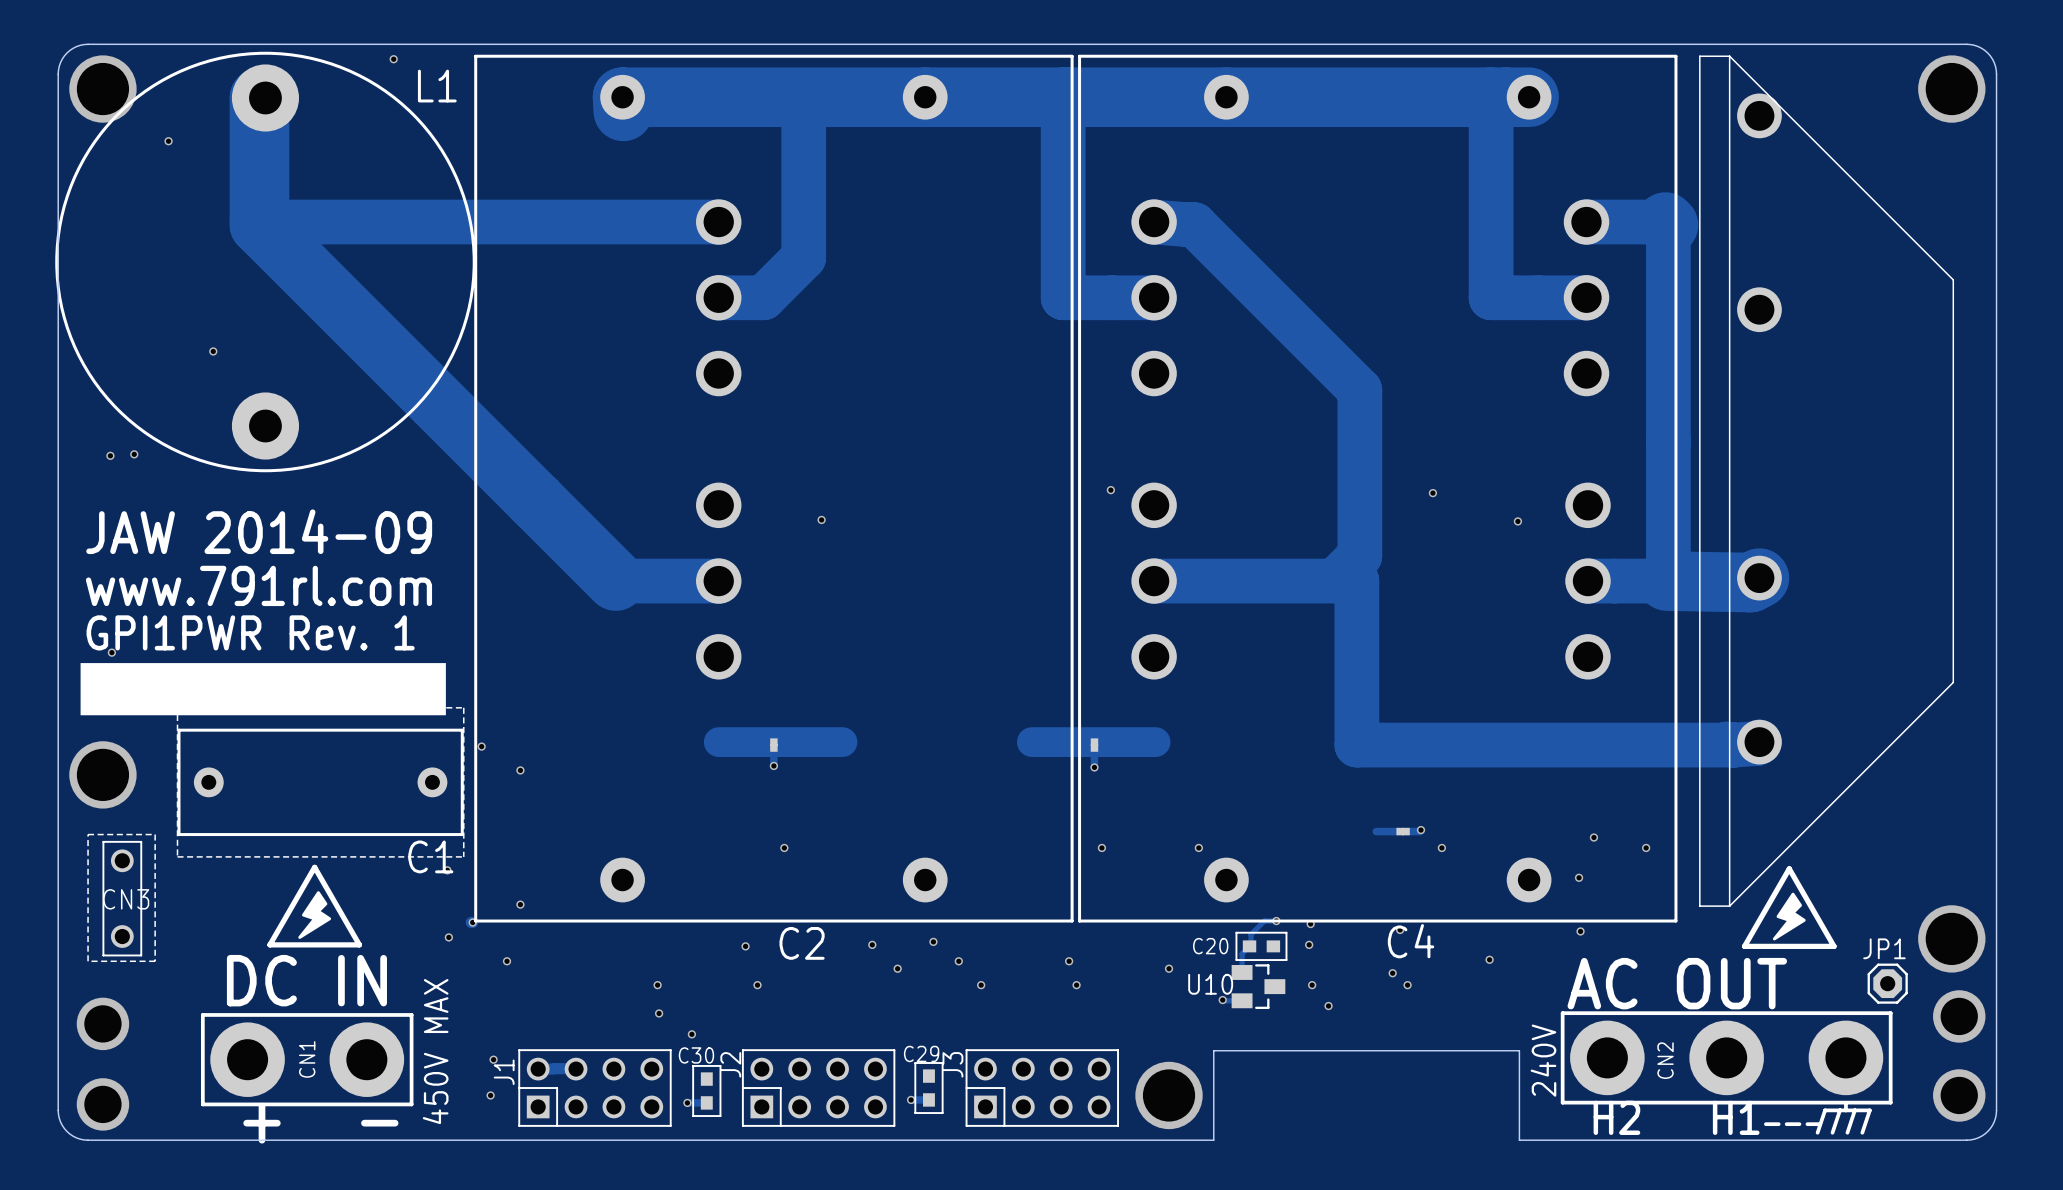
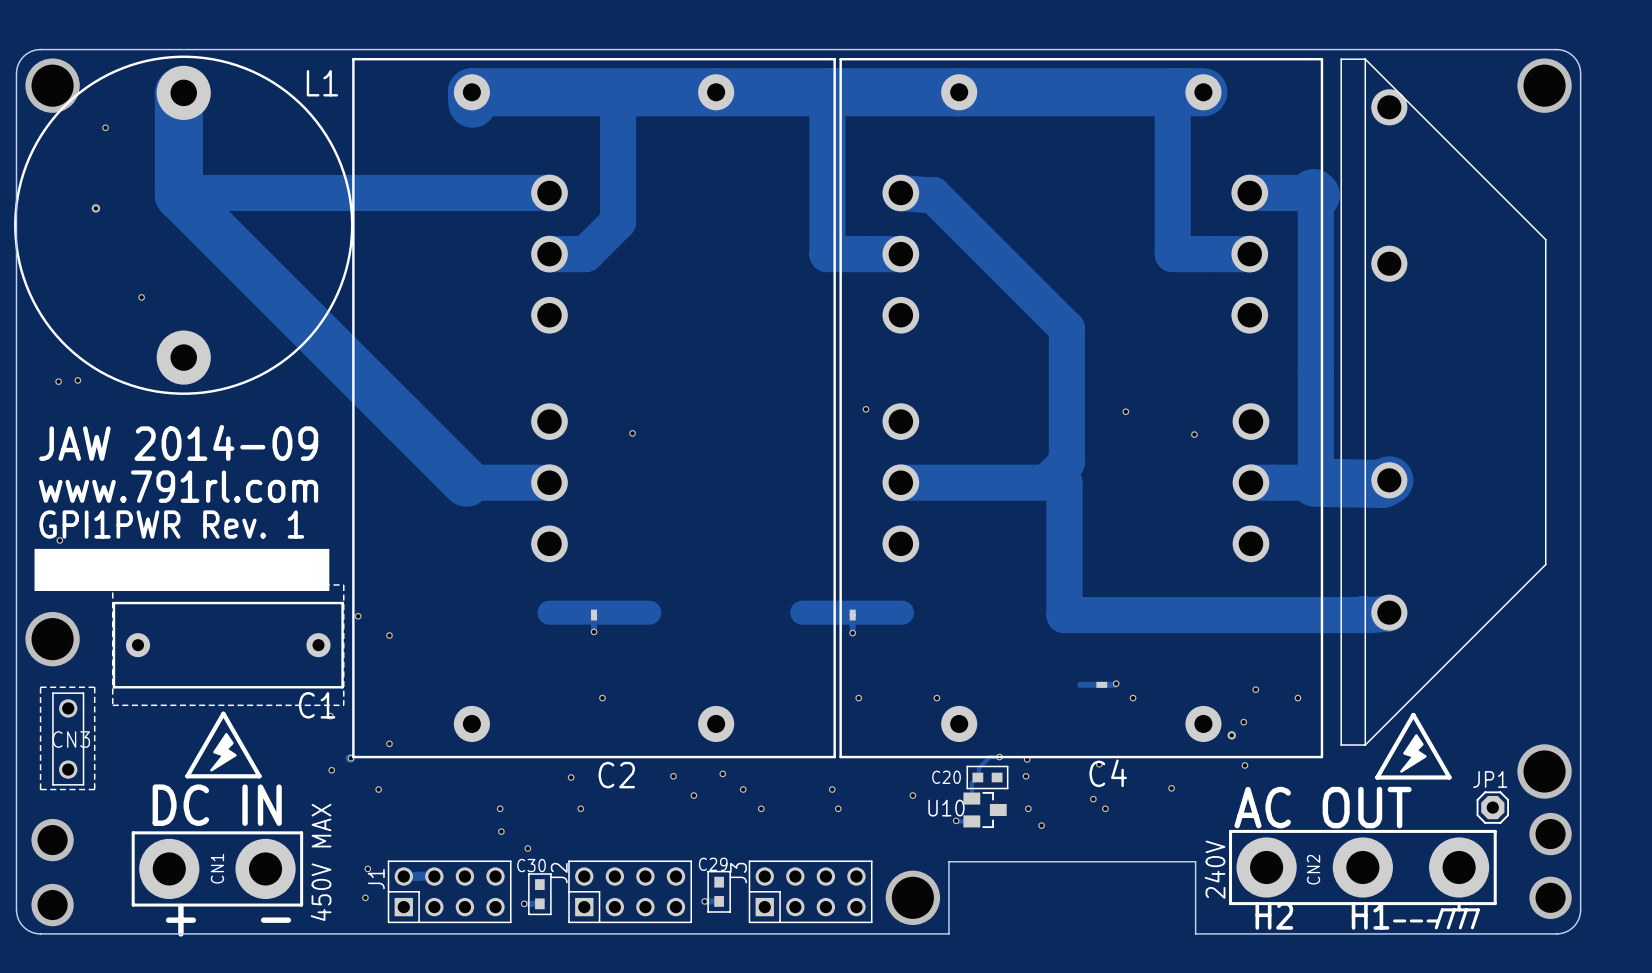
via: (393, 59) -> none
via: none -> (95, 208)
via: none -> (1231, 735)

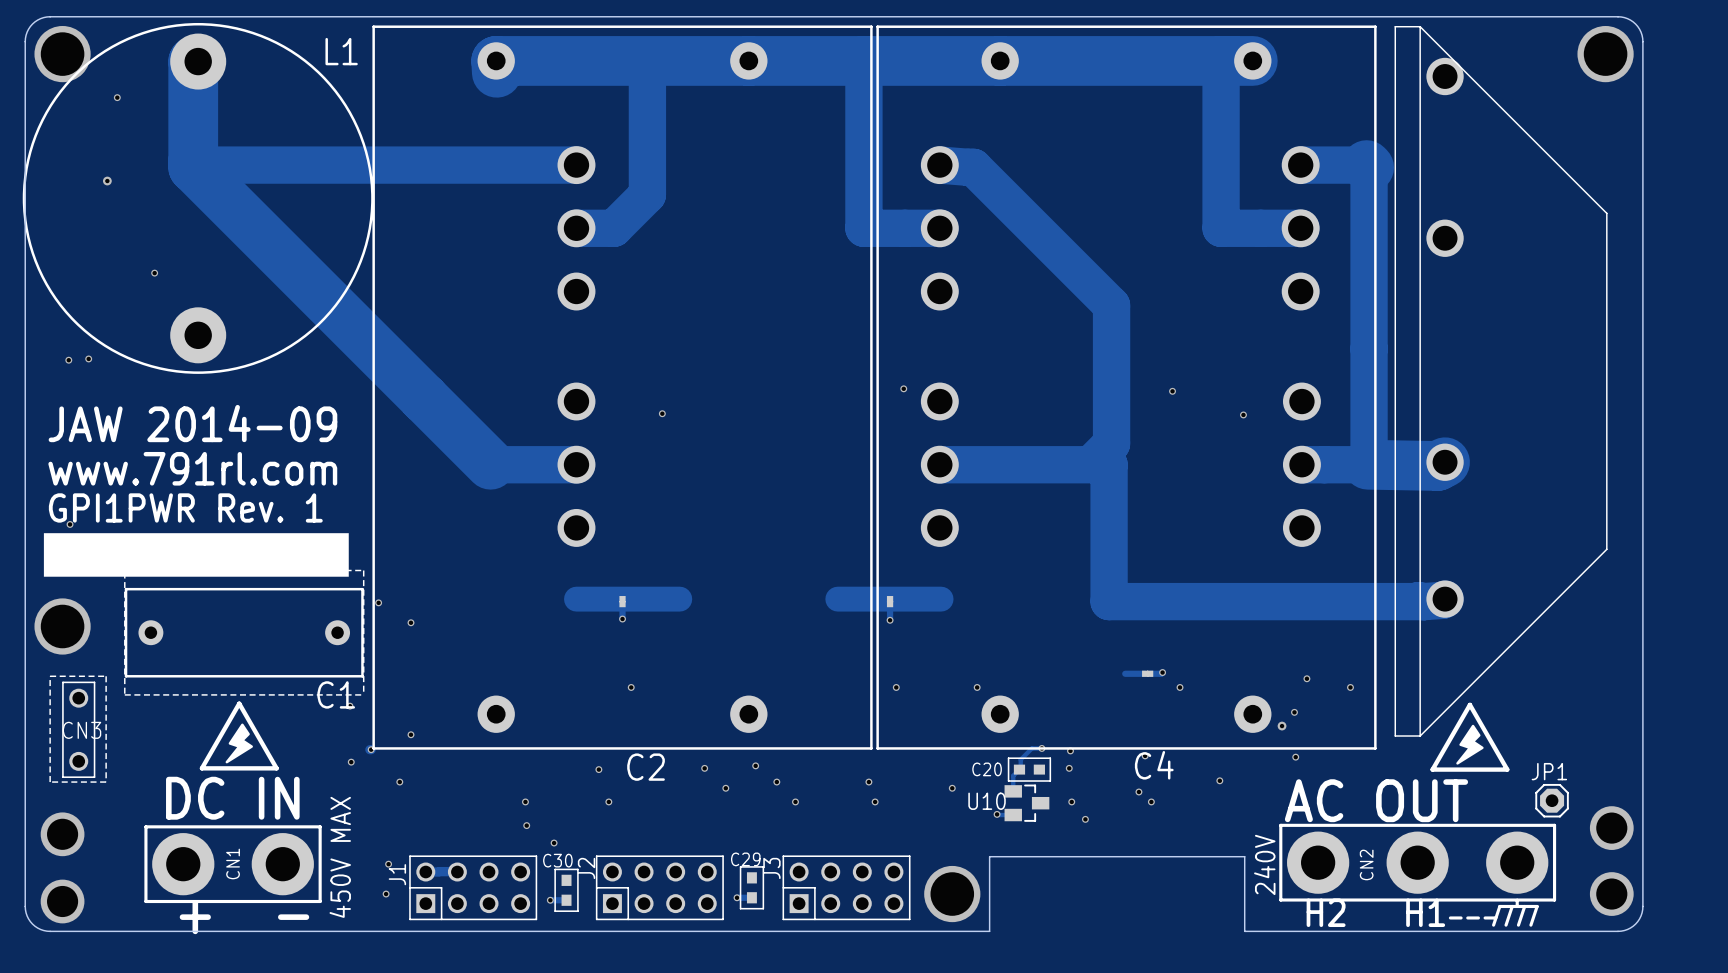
via: (1544, 771) -> none

